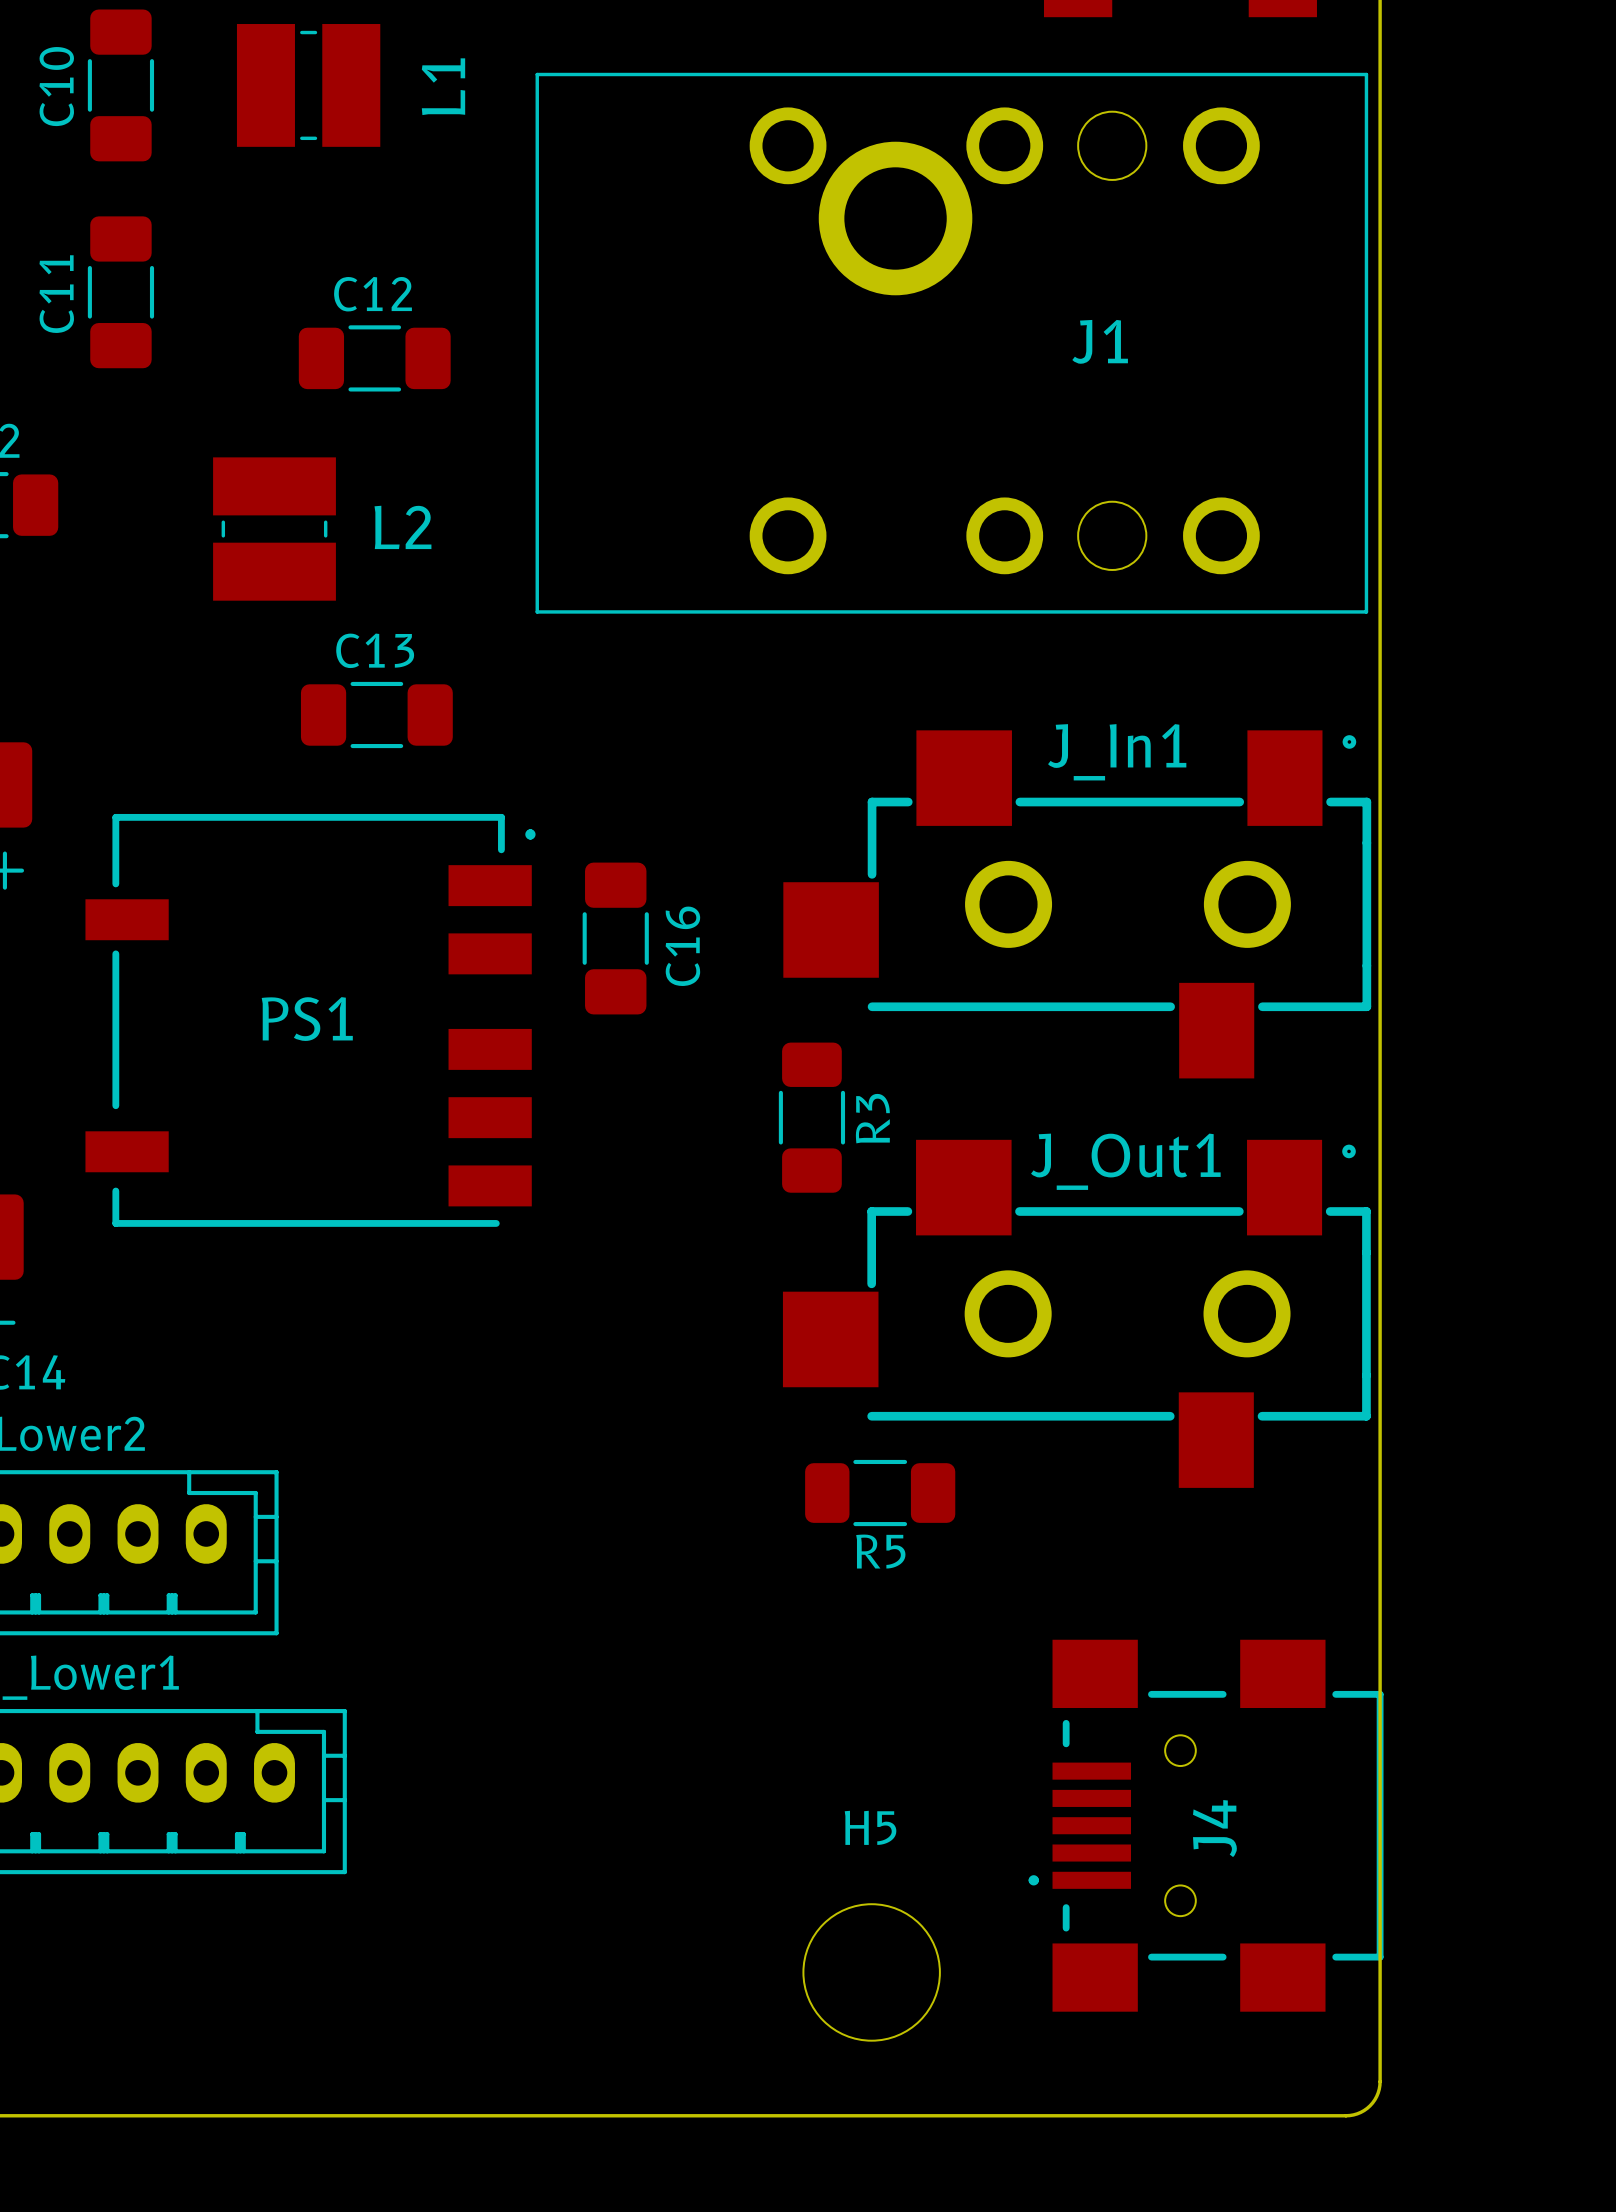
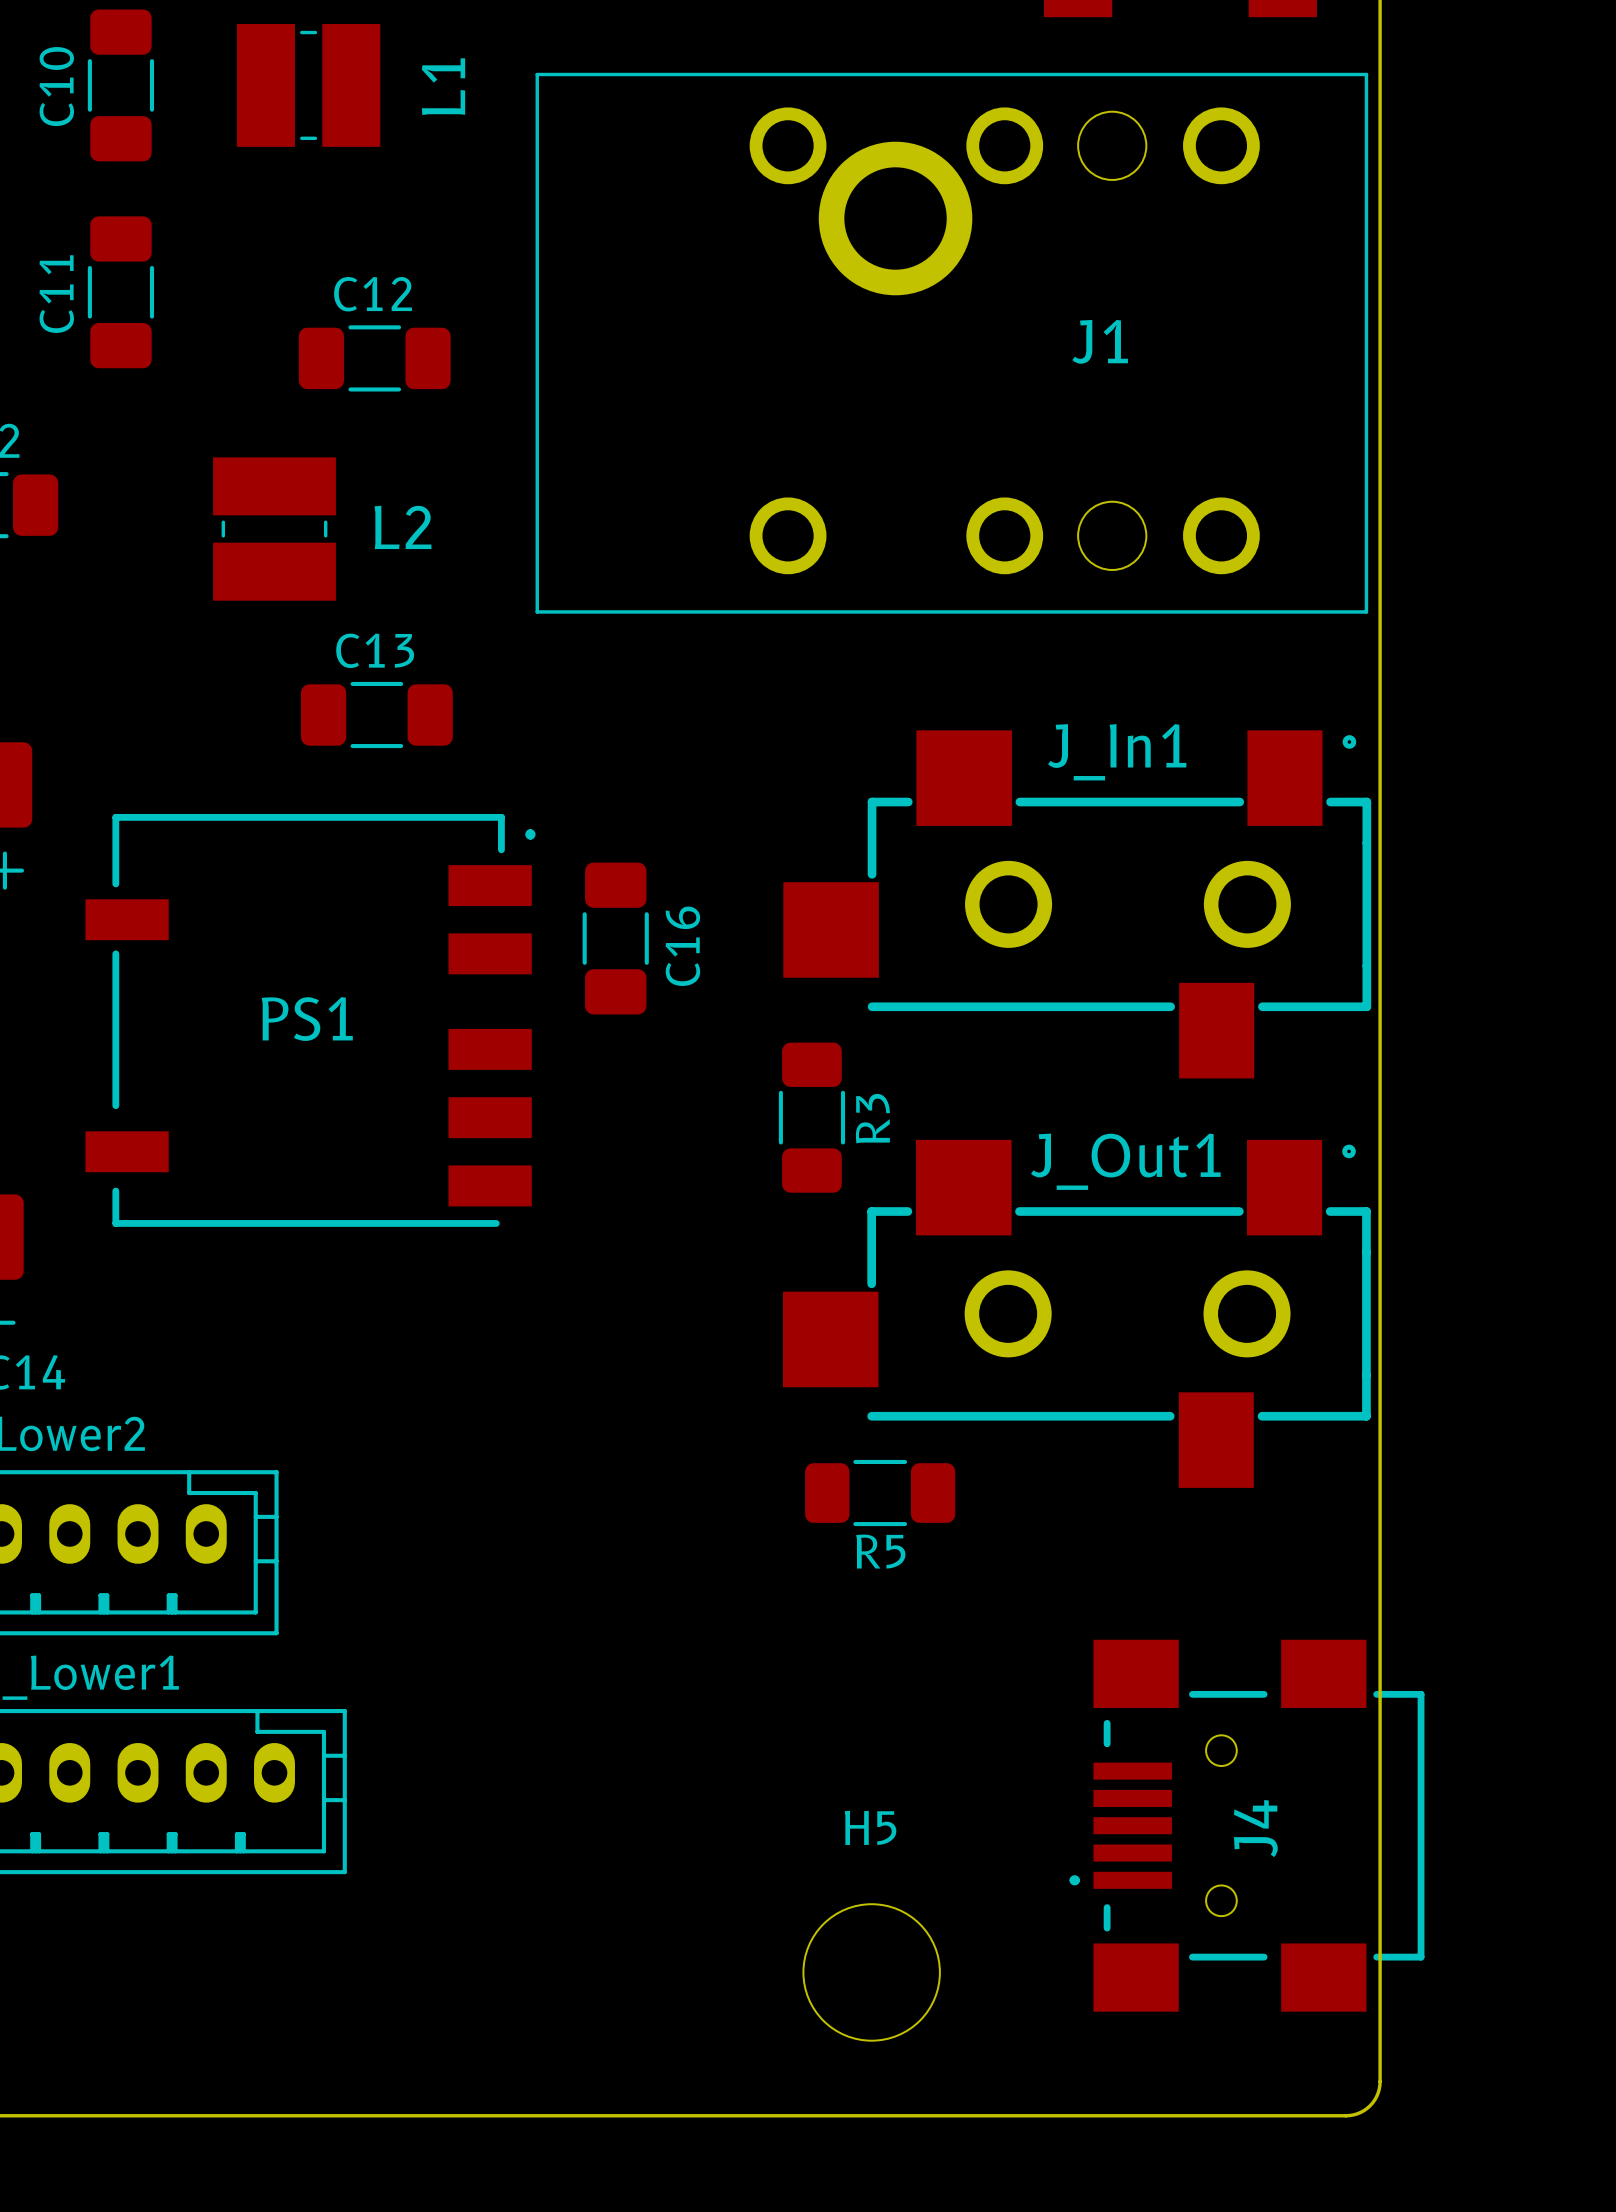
J4 position: (1206, 1825) -> (1247, 1825)

